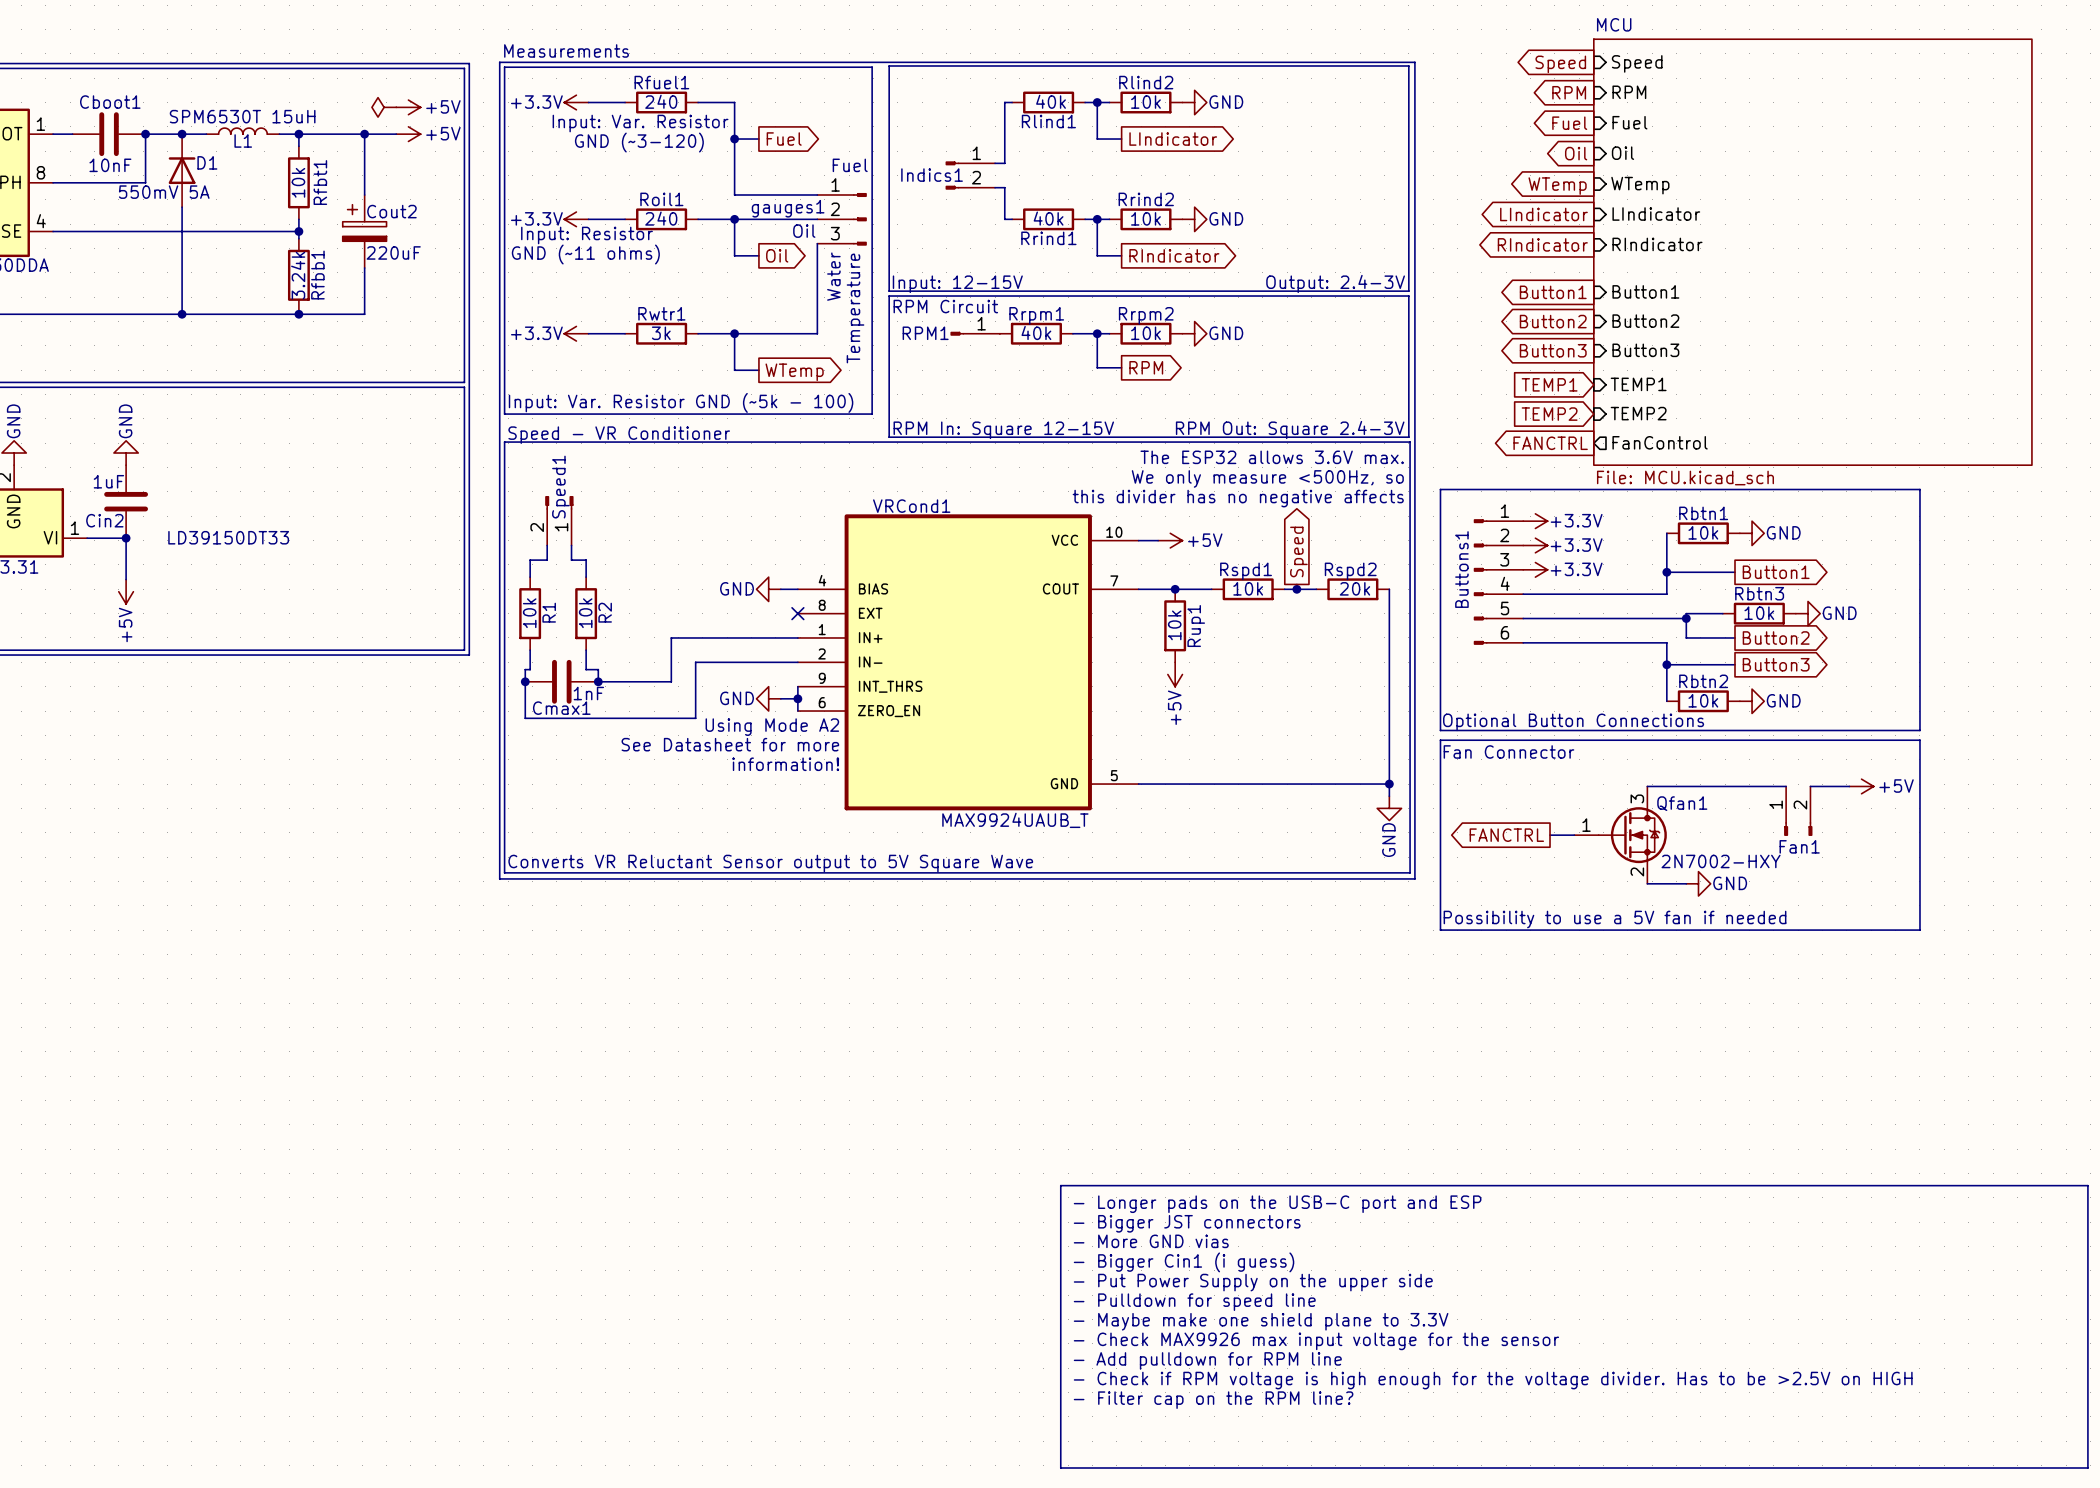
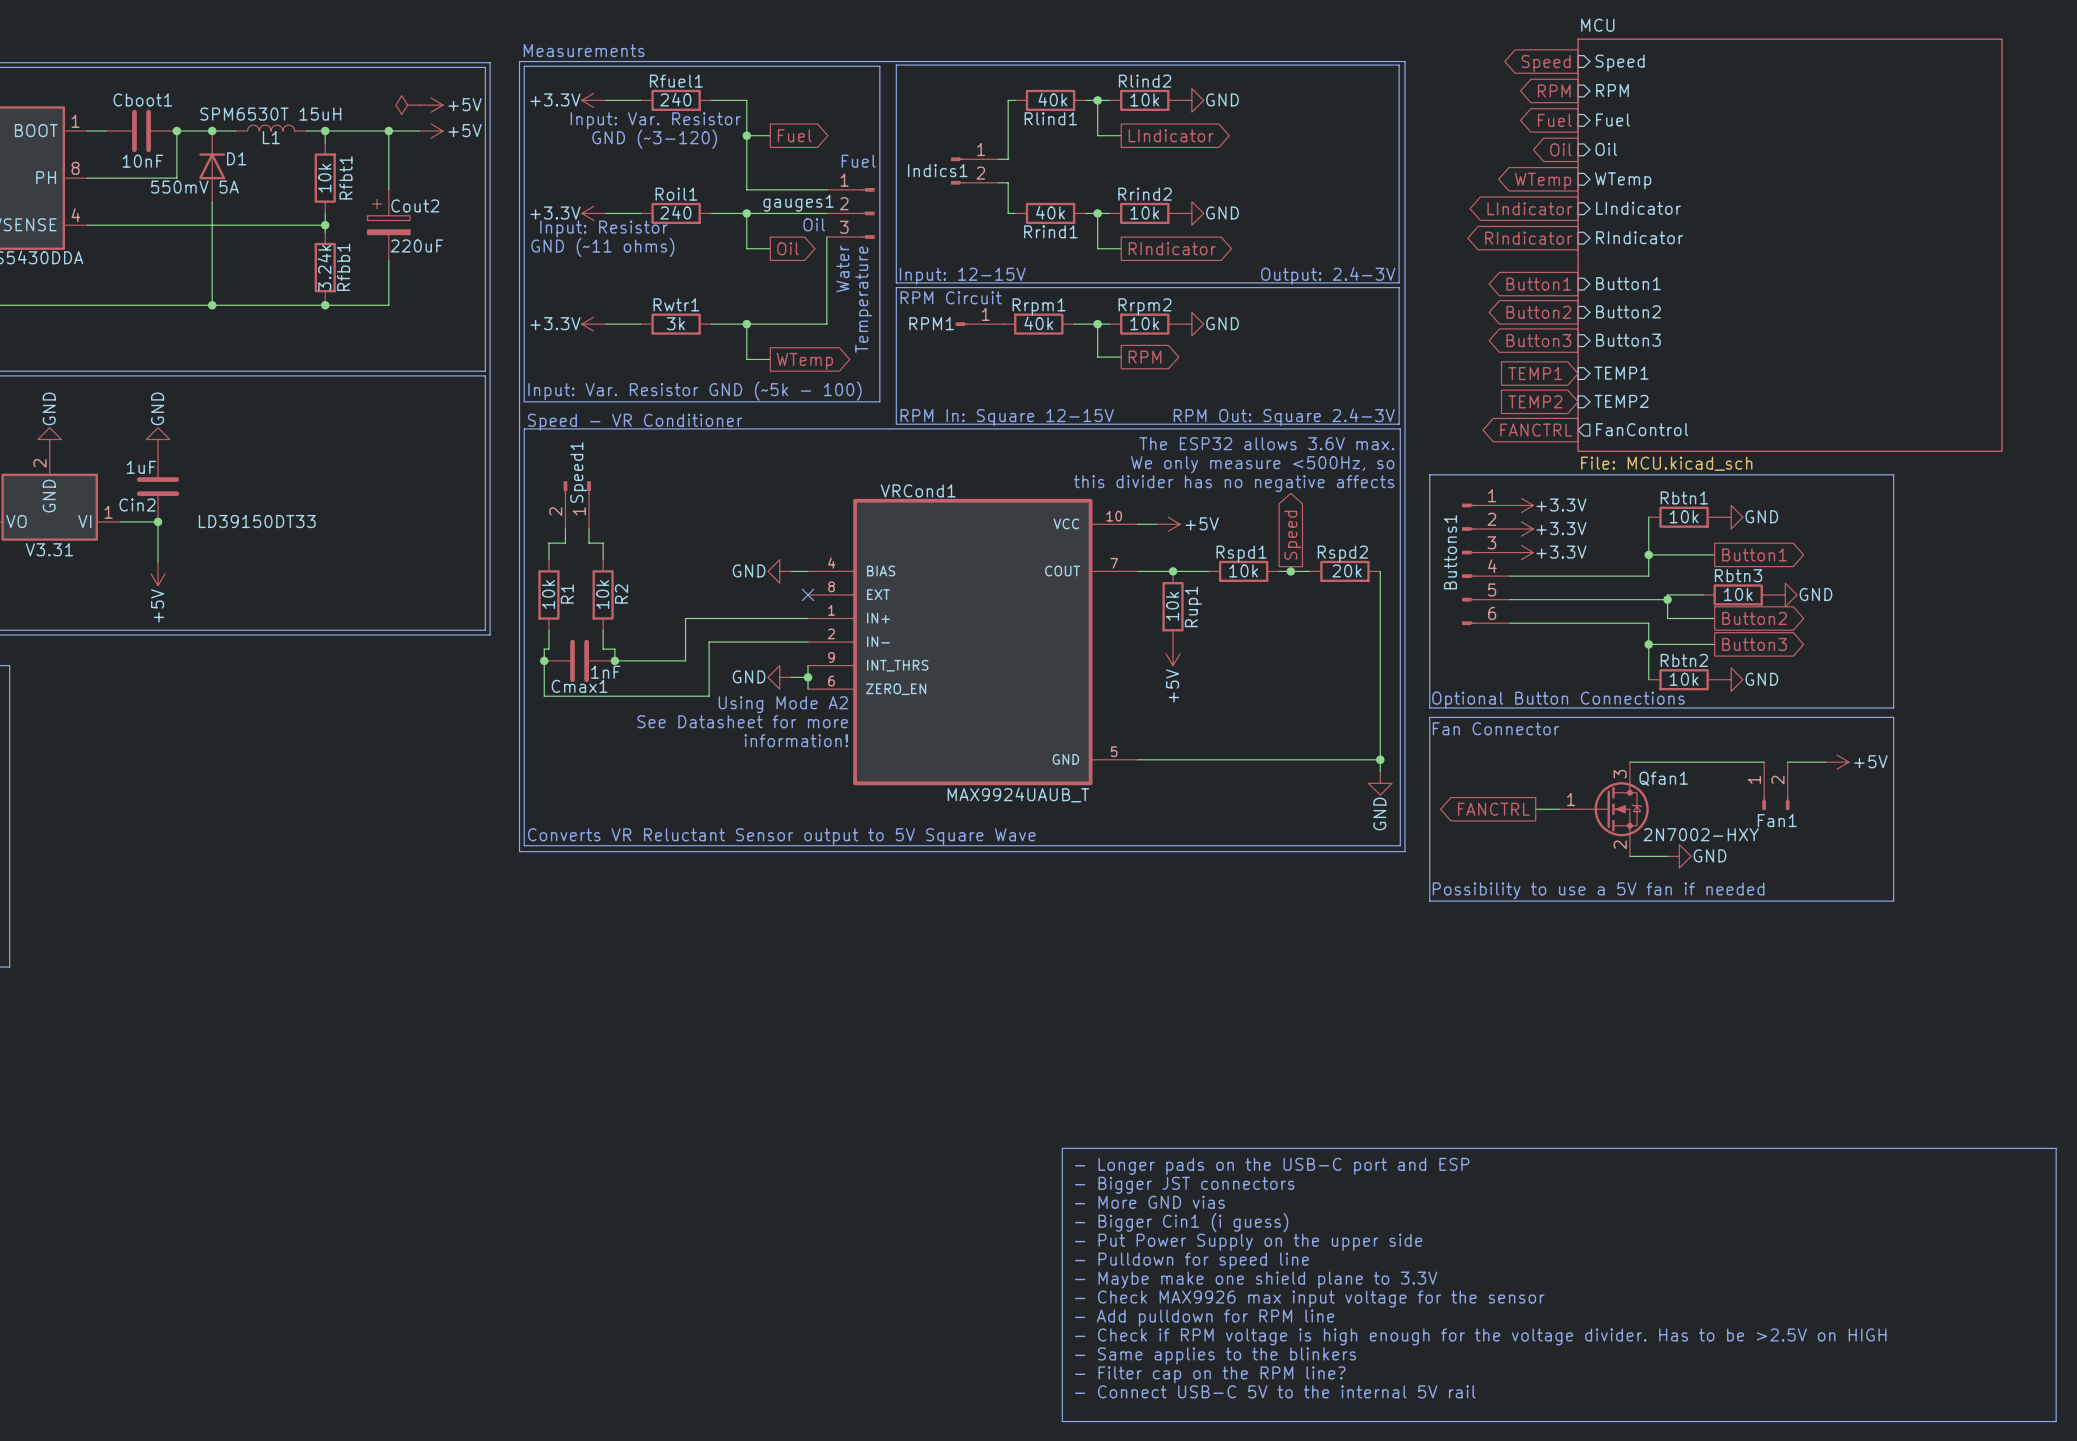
text: - Filter cap on the RPM line? (1213, 1400) -> - Same applies to the blinkers (1215, 1355)
text: none -> - Filter cap on the RPM line? (1210, 1374)
text: none -> - Connect USB-C 5V to the internal 5V rail (1275, 1391)

